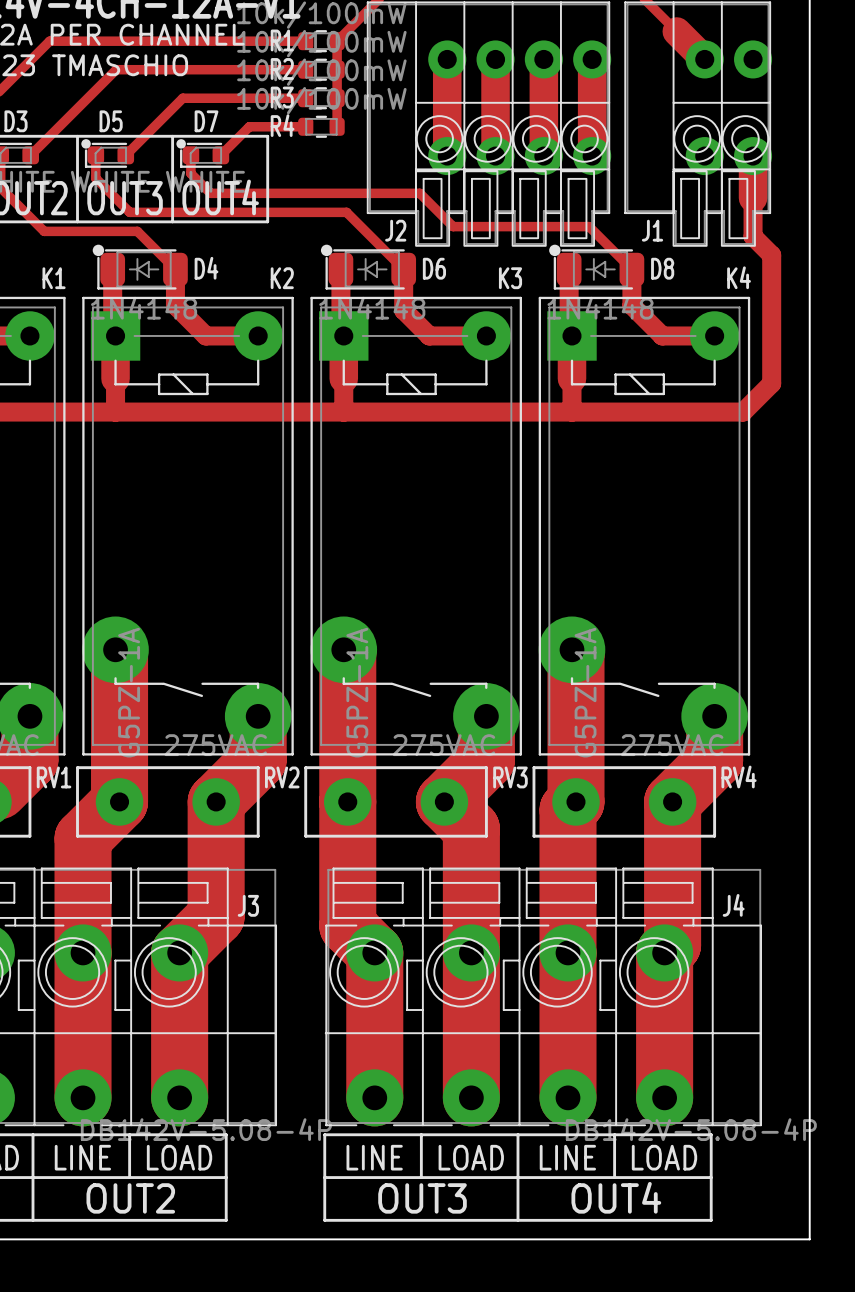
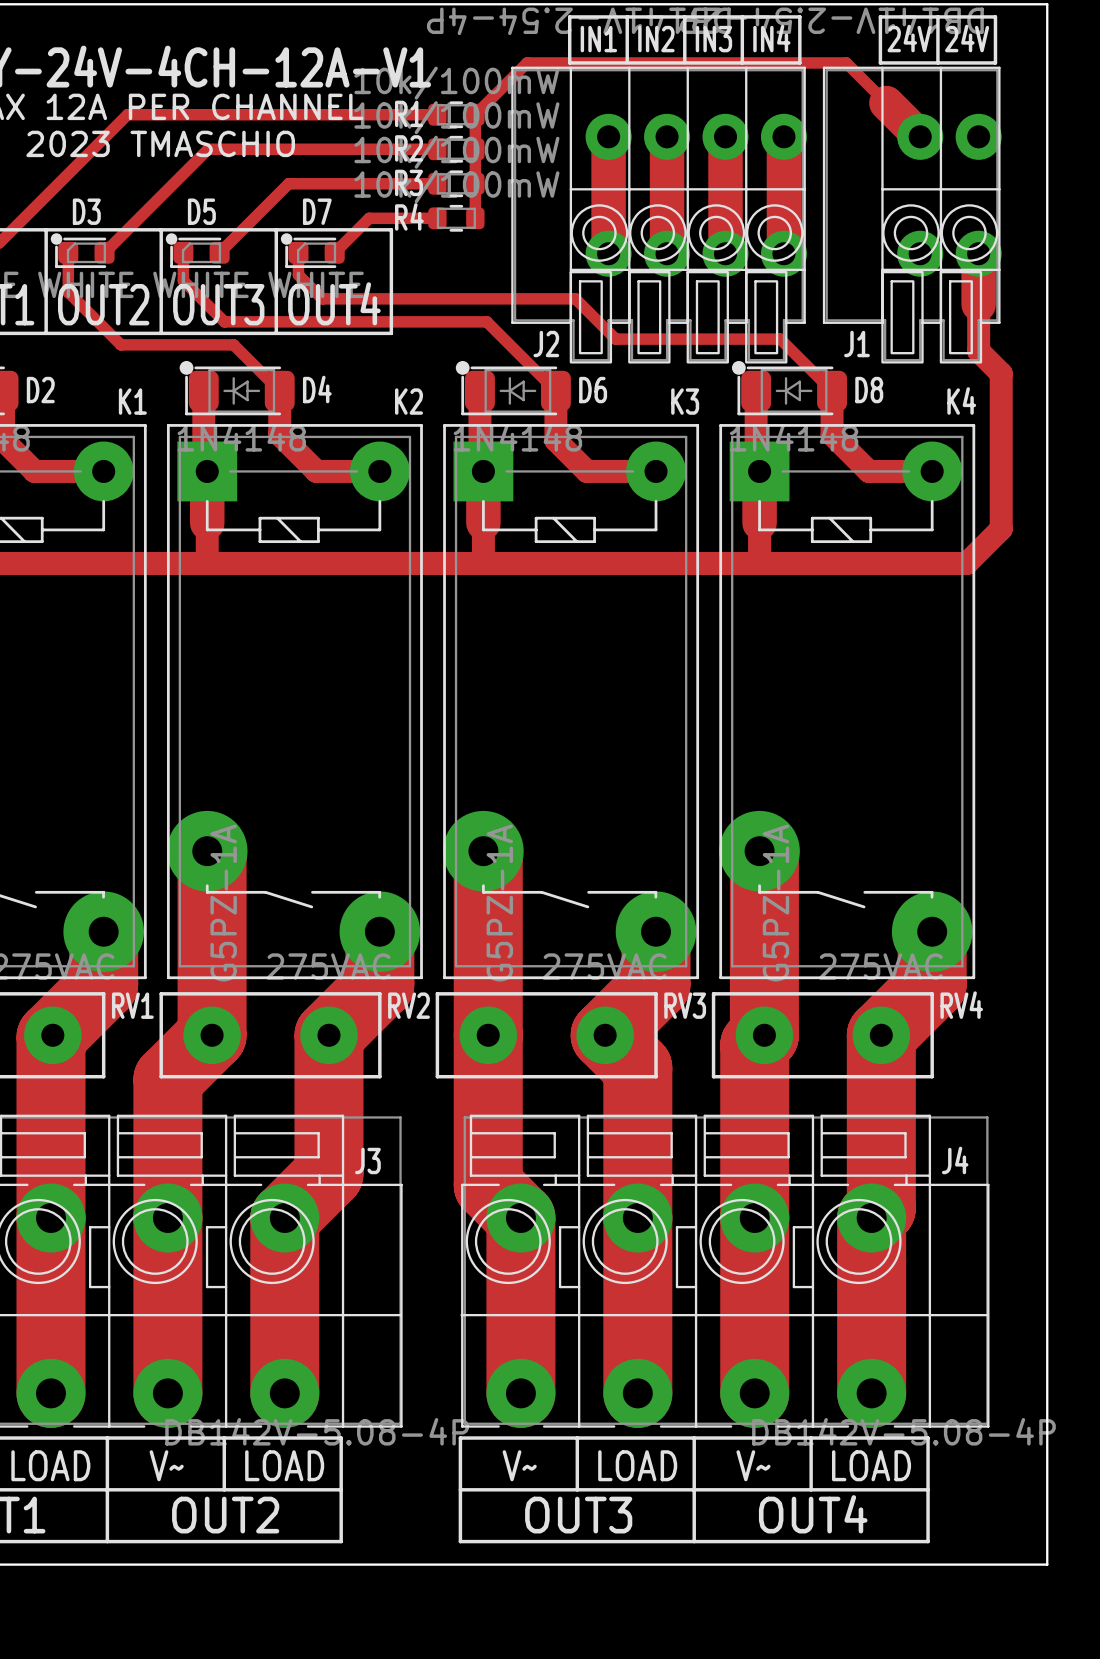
text: LINE (82, 1157) -> V~ (166, 1465)
text: LINE (374, 1157) -> V~ (519, 1465)
text: LINE (567, 1157) -> V~ (753, 1465)

